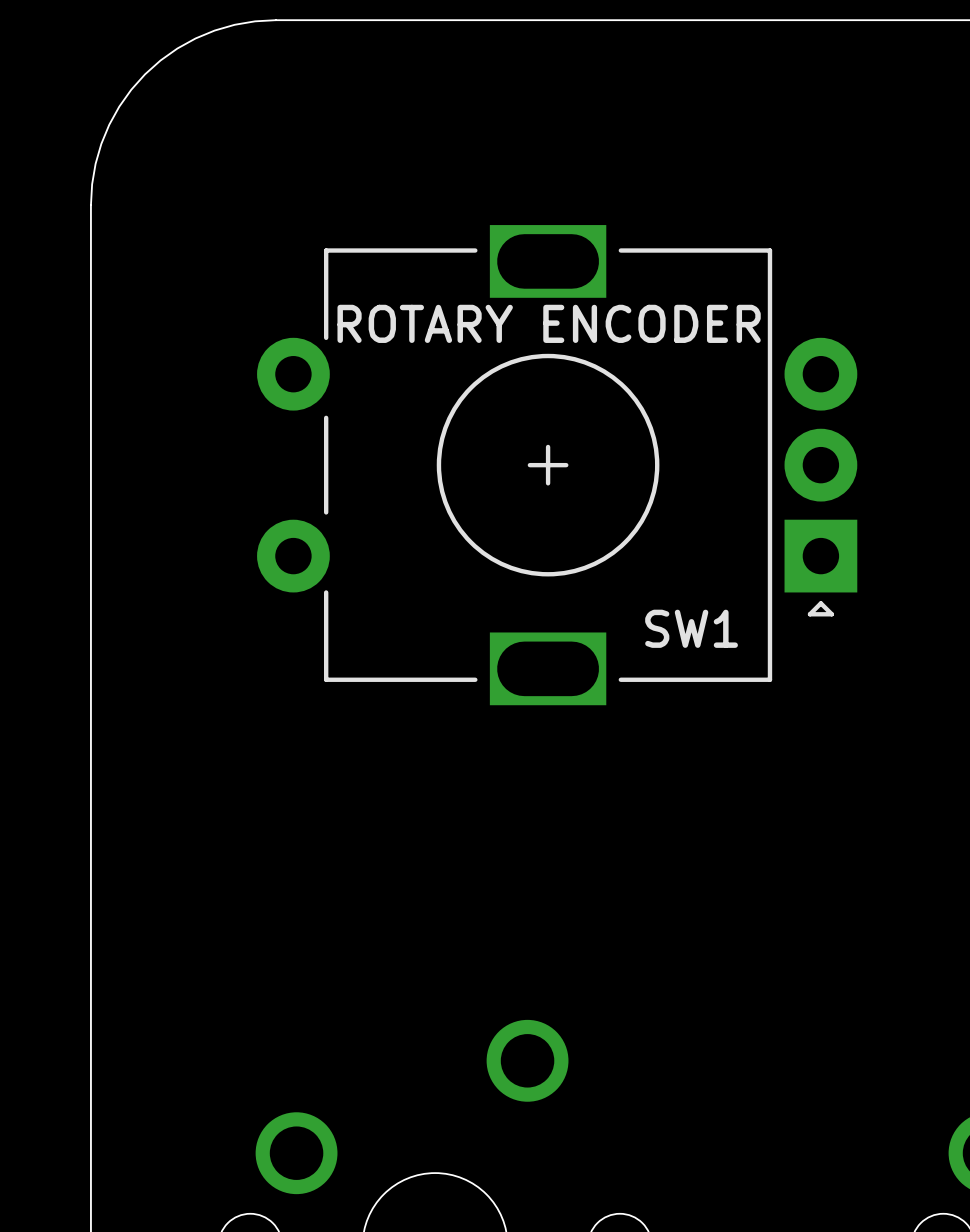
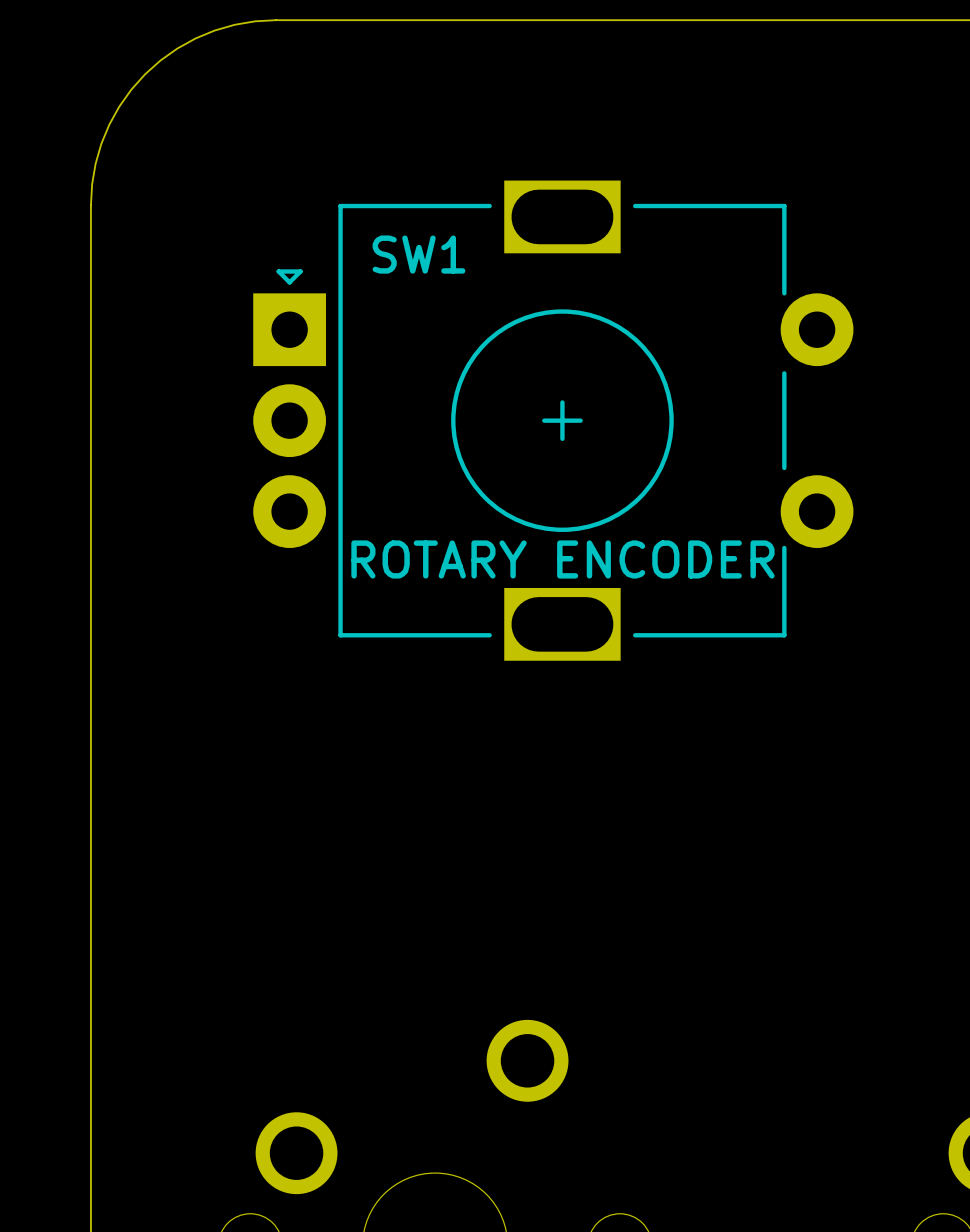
SW1 rotation: 0° (557, 465) -> 180° (553, 420)

